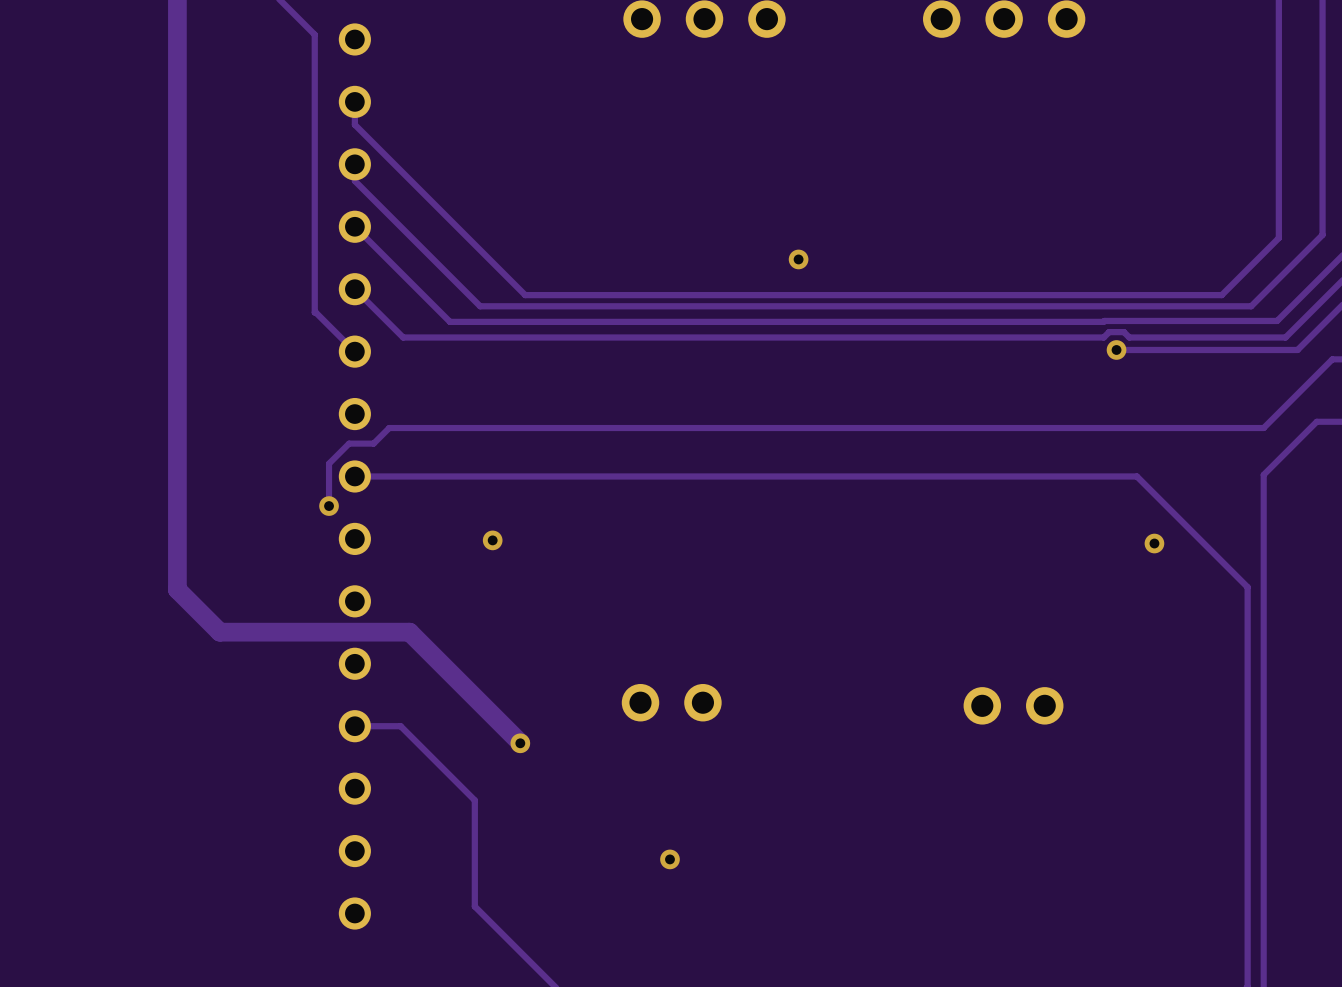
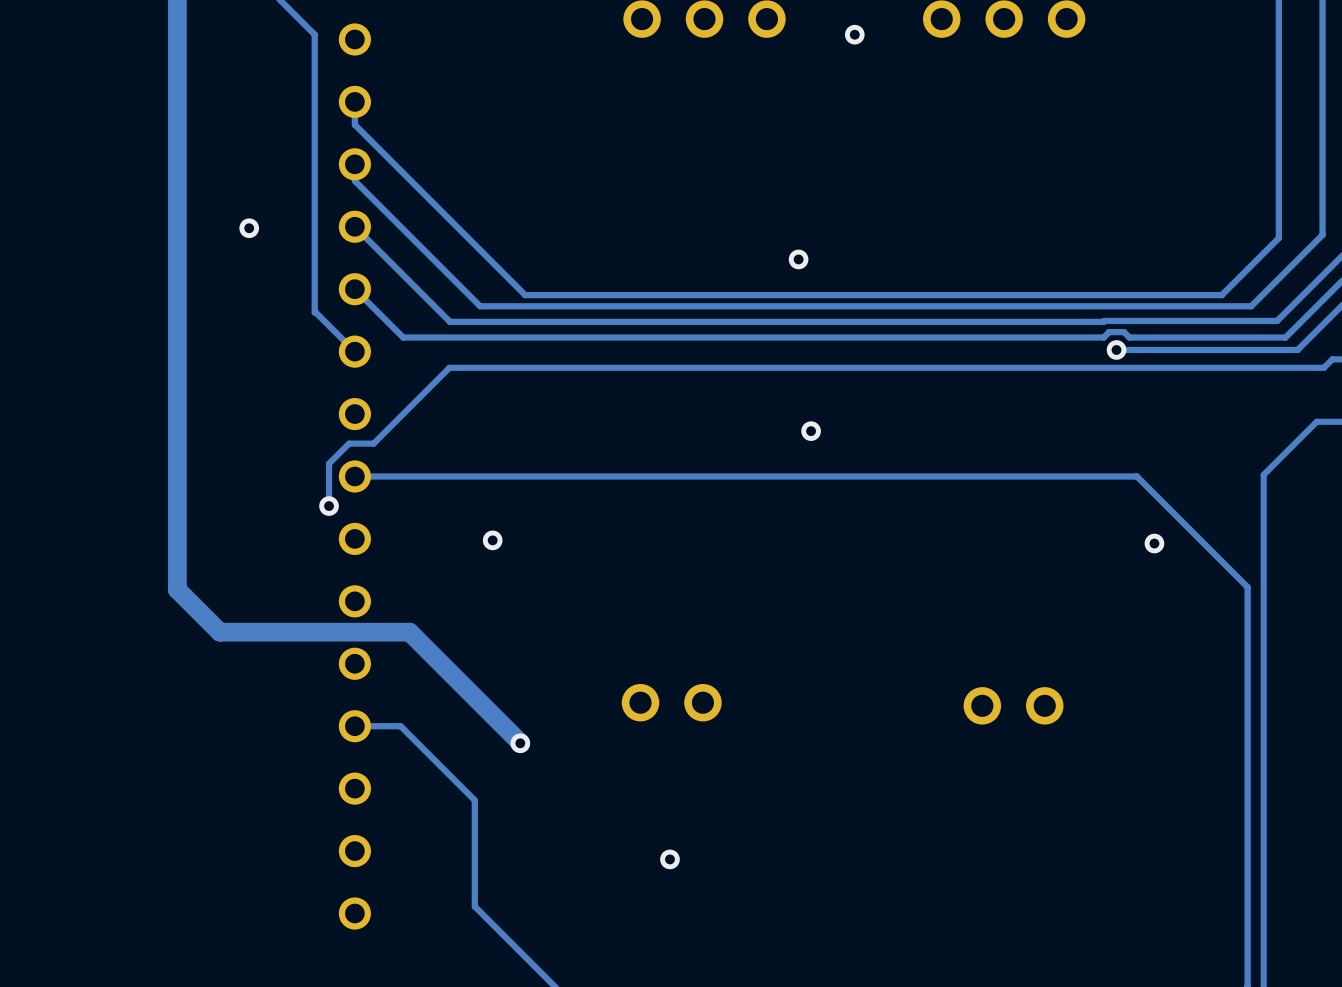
via: none -> (854, 34)
via: none -> (249, 228)
track: (1323, 367) (1263, 428) (389, 428) (373, 443) -> (1323, 367) (449, 367) (373, 443)
via: none -> (811, 431)

